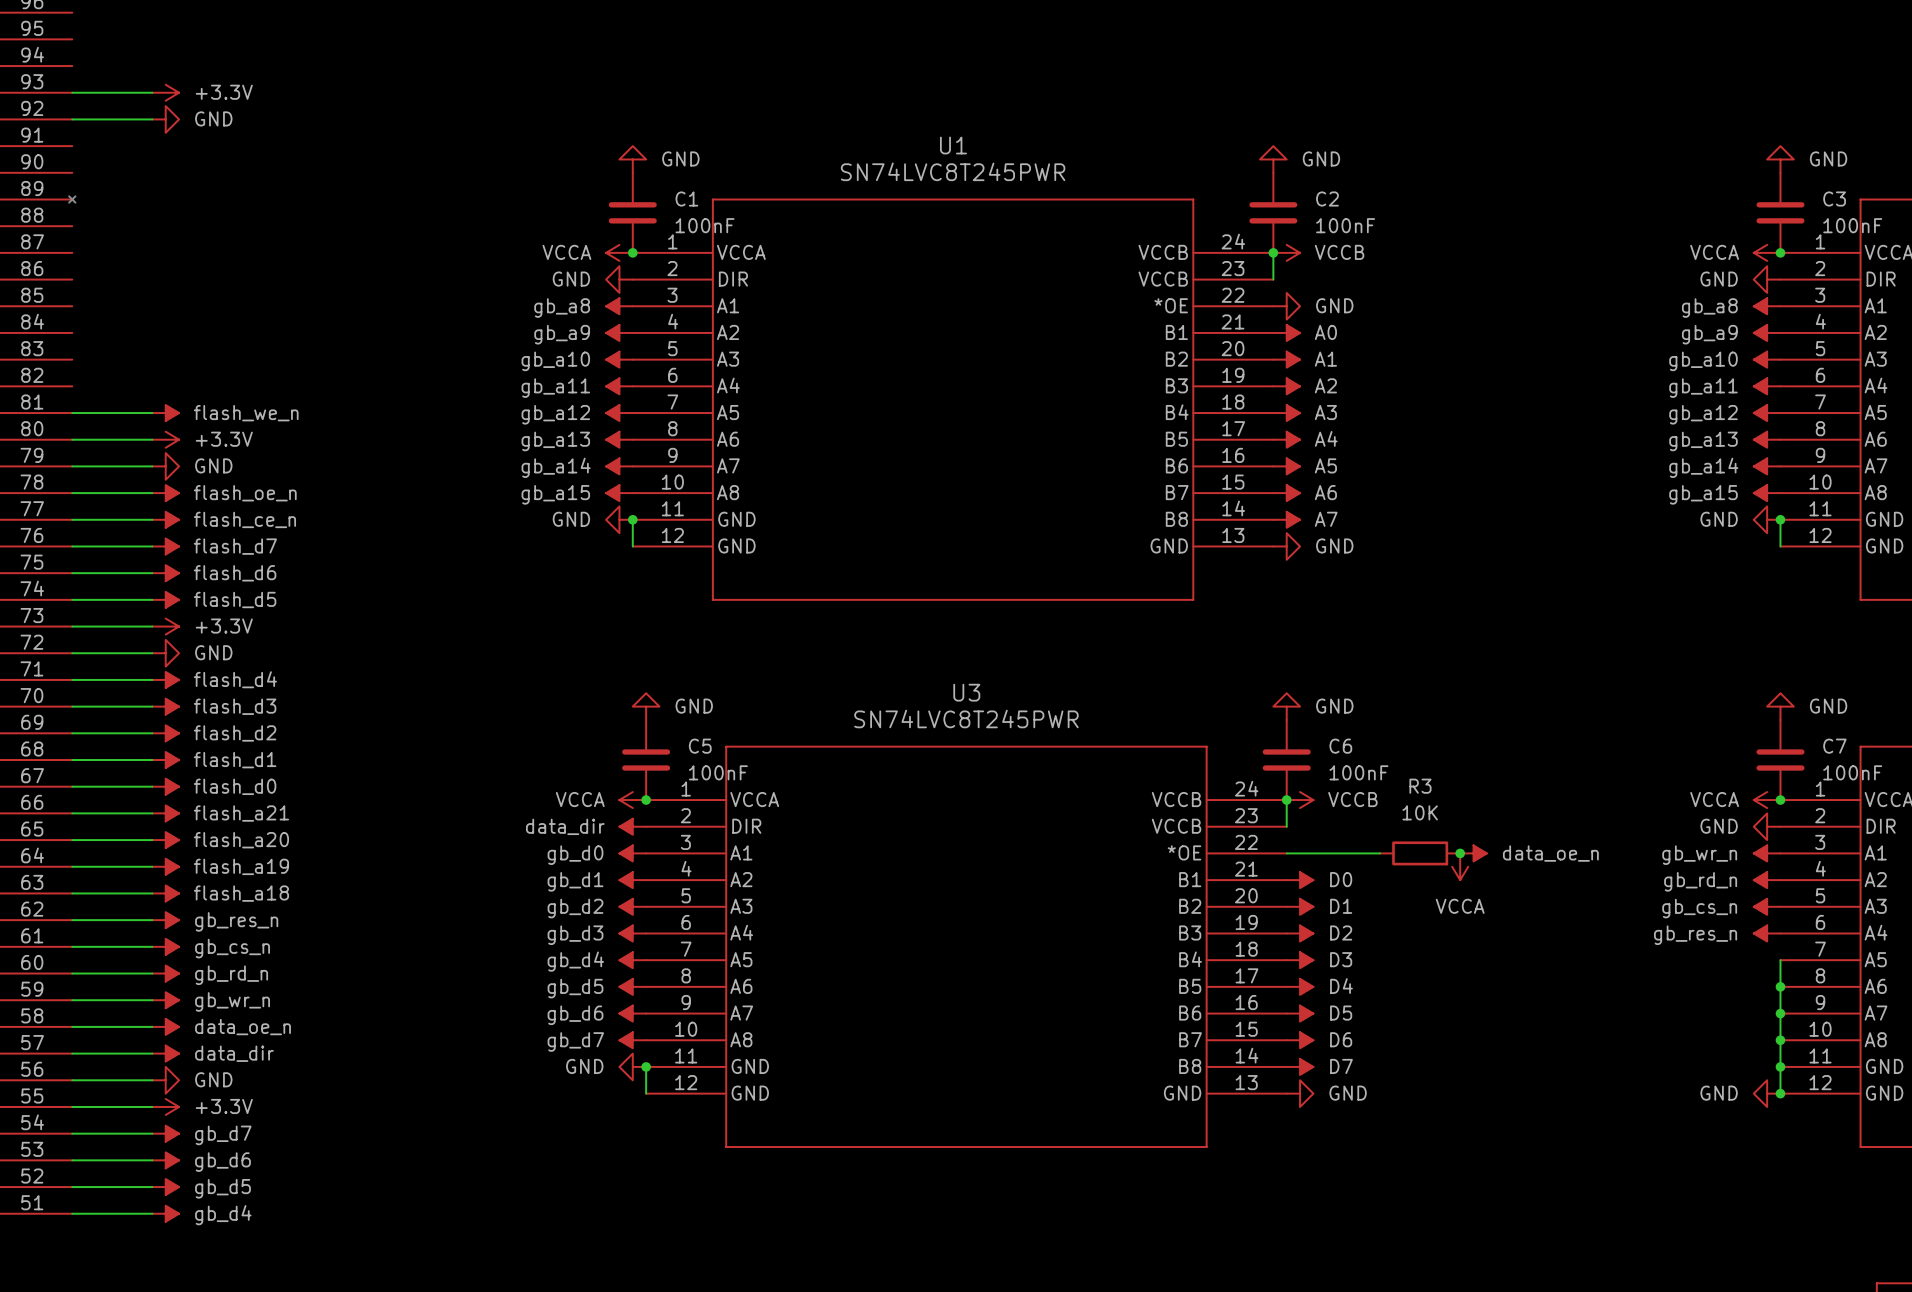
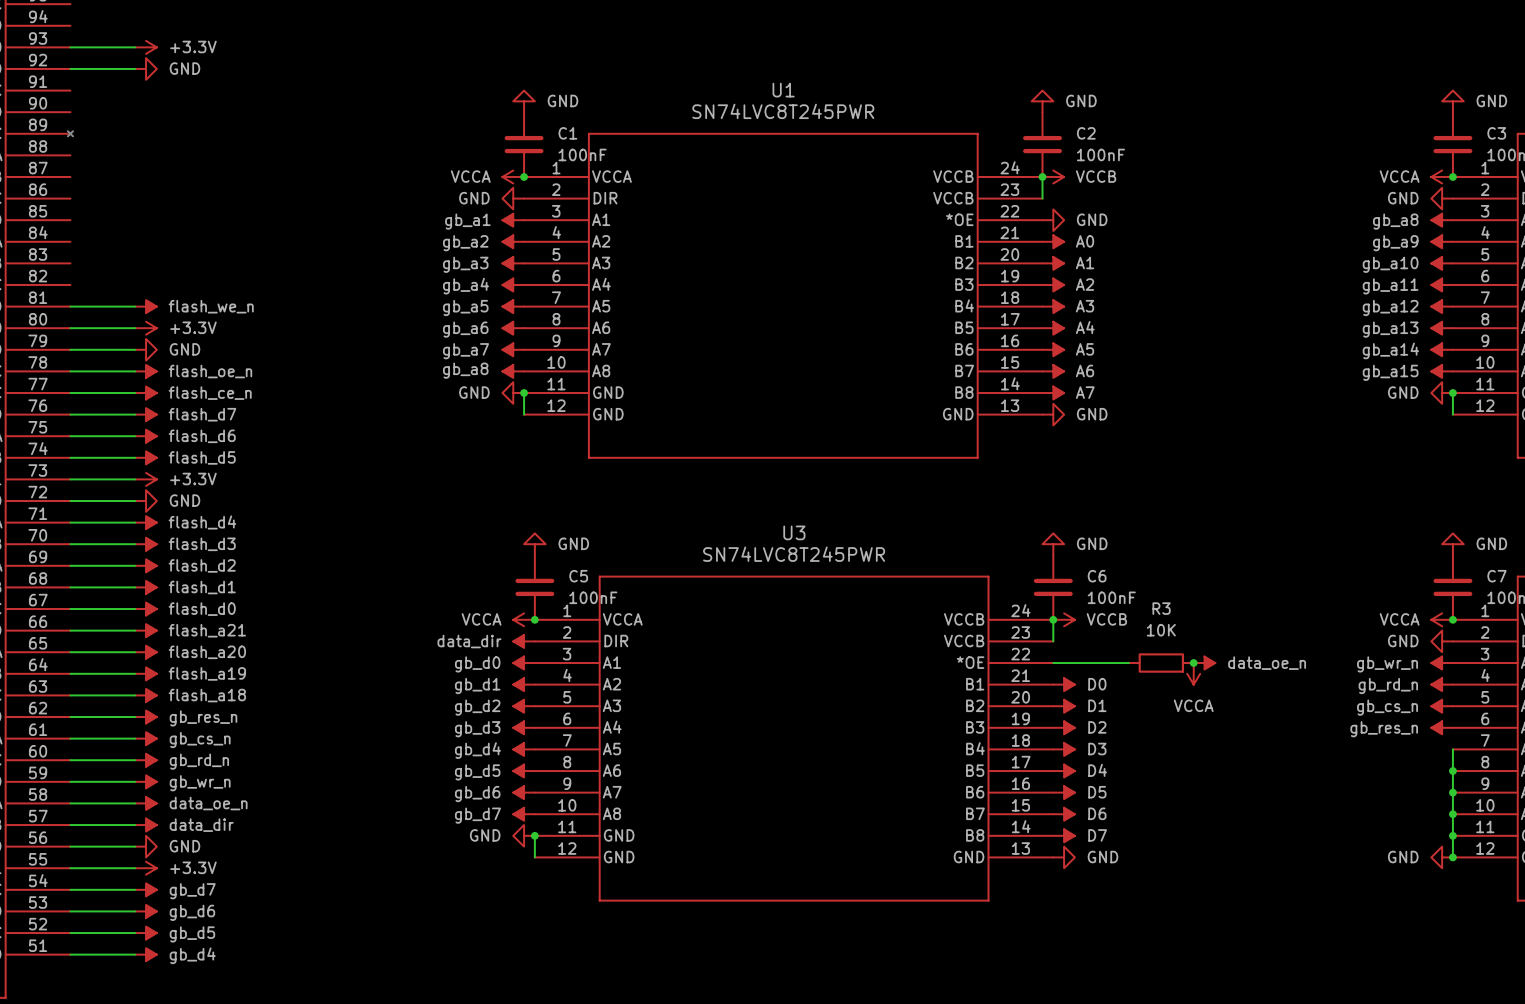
power symbol: gb_a8 (619, 306) -> gb_a1 (513, 220)
power symbol: gb_a9 (619, 332) -> gb_a2 (513, 241)
power symbol: gb_a10 (619, 359) -> gb_a3 (513, 263)
power symbol: gb_a11 (619, 386) -> gb_a4 (513, 284)
power symbol: gb_a12 (619, 413) -> gb_a5 (513, 306)
power symbol: gb_a13 (619, 439) -> gb_a6 (513, 328)
power symbol: gb_a14 (619, 466) -> gb_a7 (513, 349)
power symbol: gb_a15 (619, 493) -> gb_a8 (513, 371)

